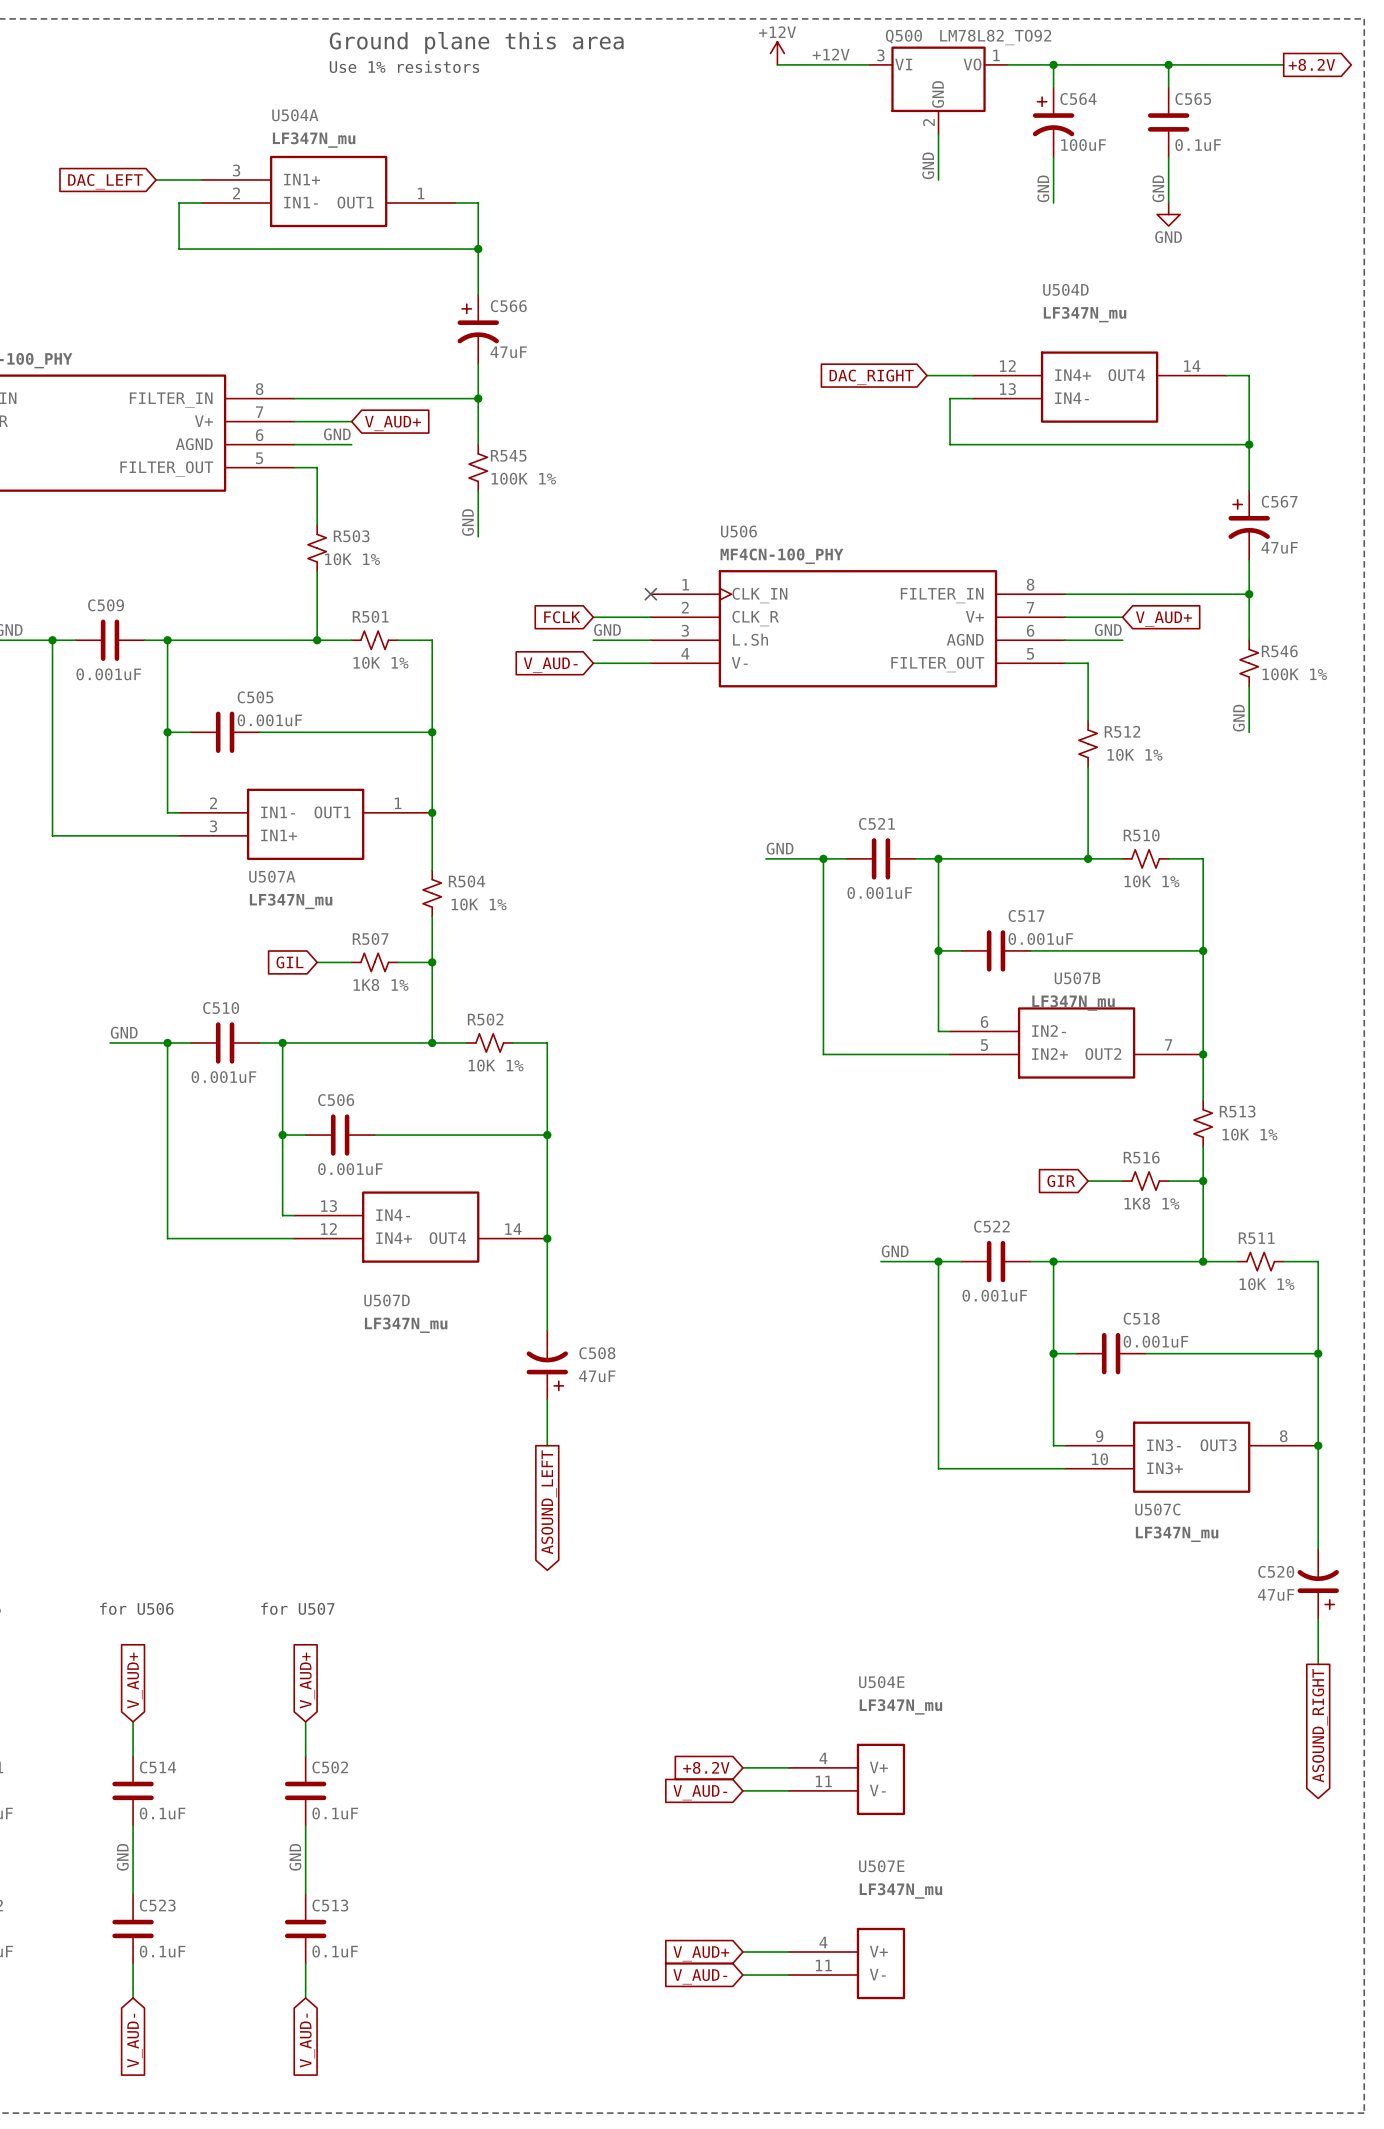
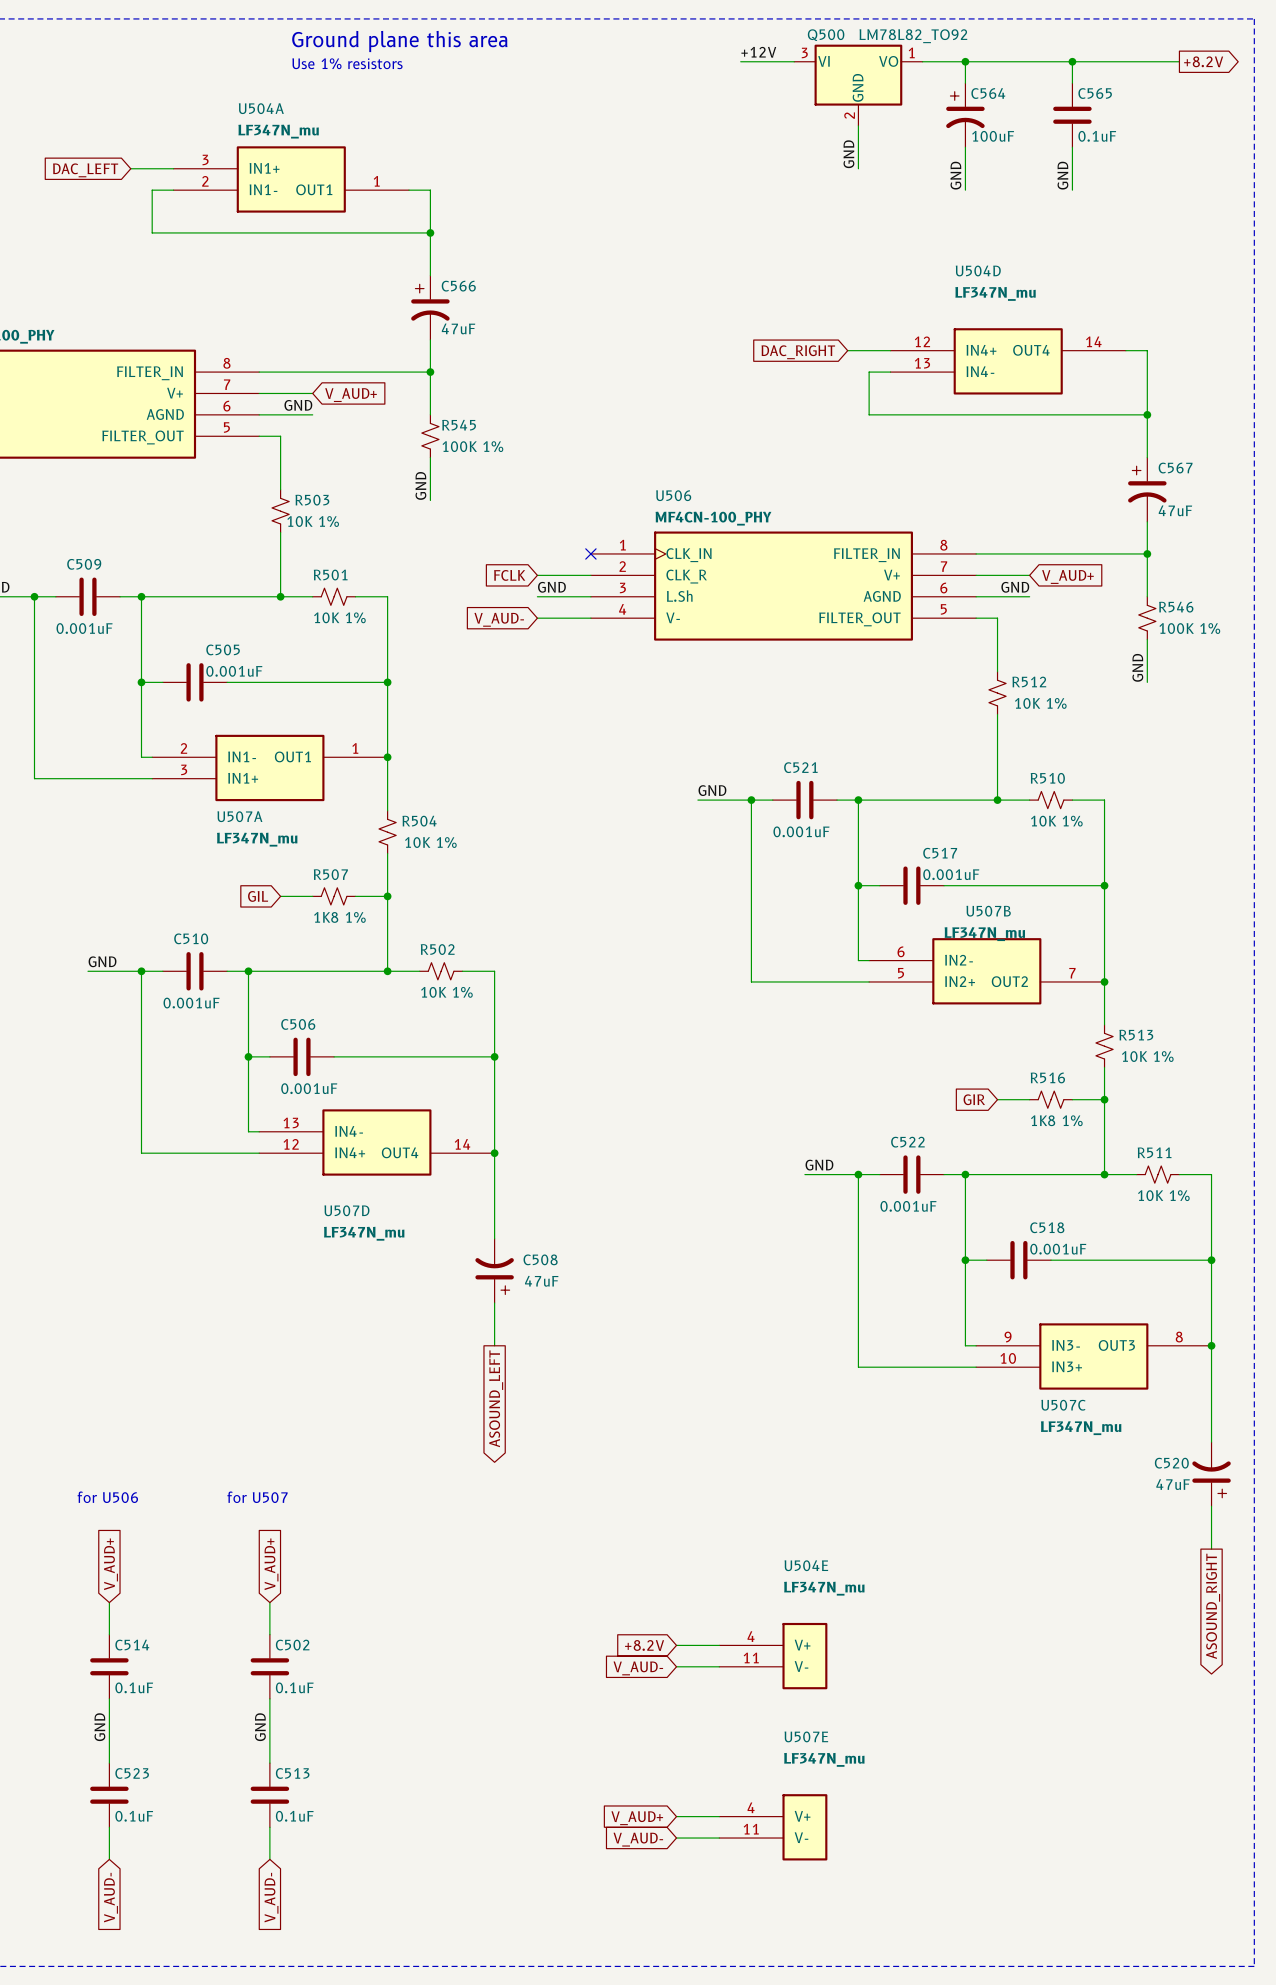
power symbol: +12V (777, 53) -> none
wire: (777, 64) (811, 64) -> none
power symbol: GND (1168, 214) -> none

